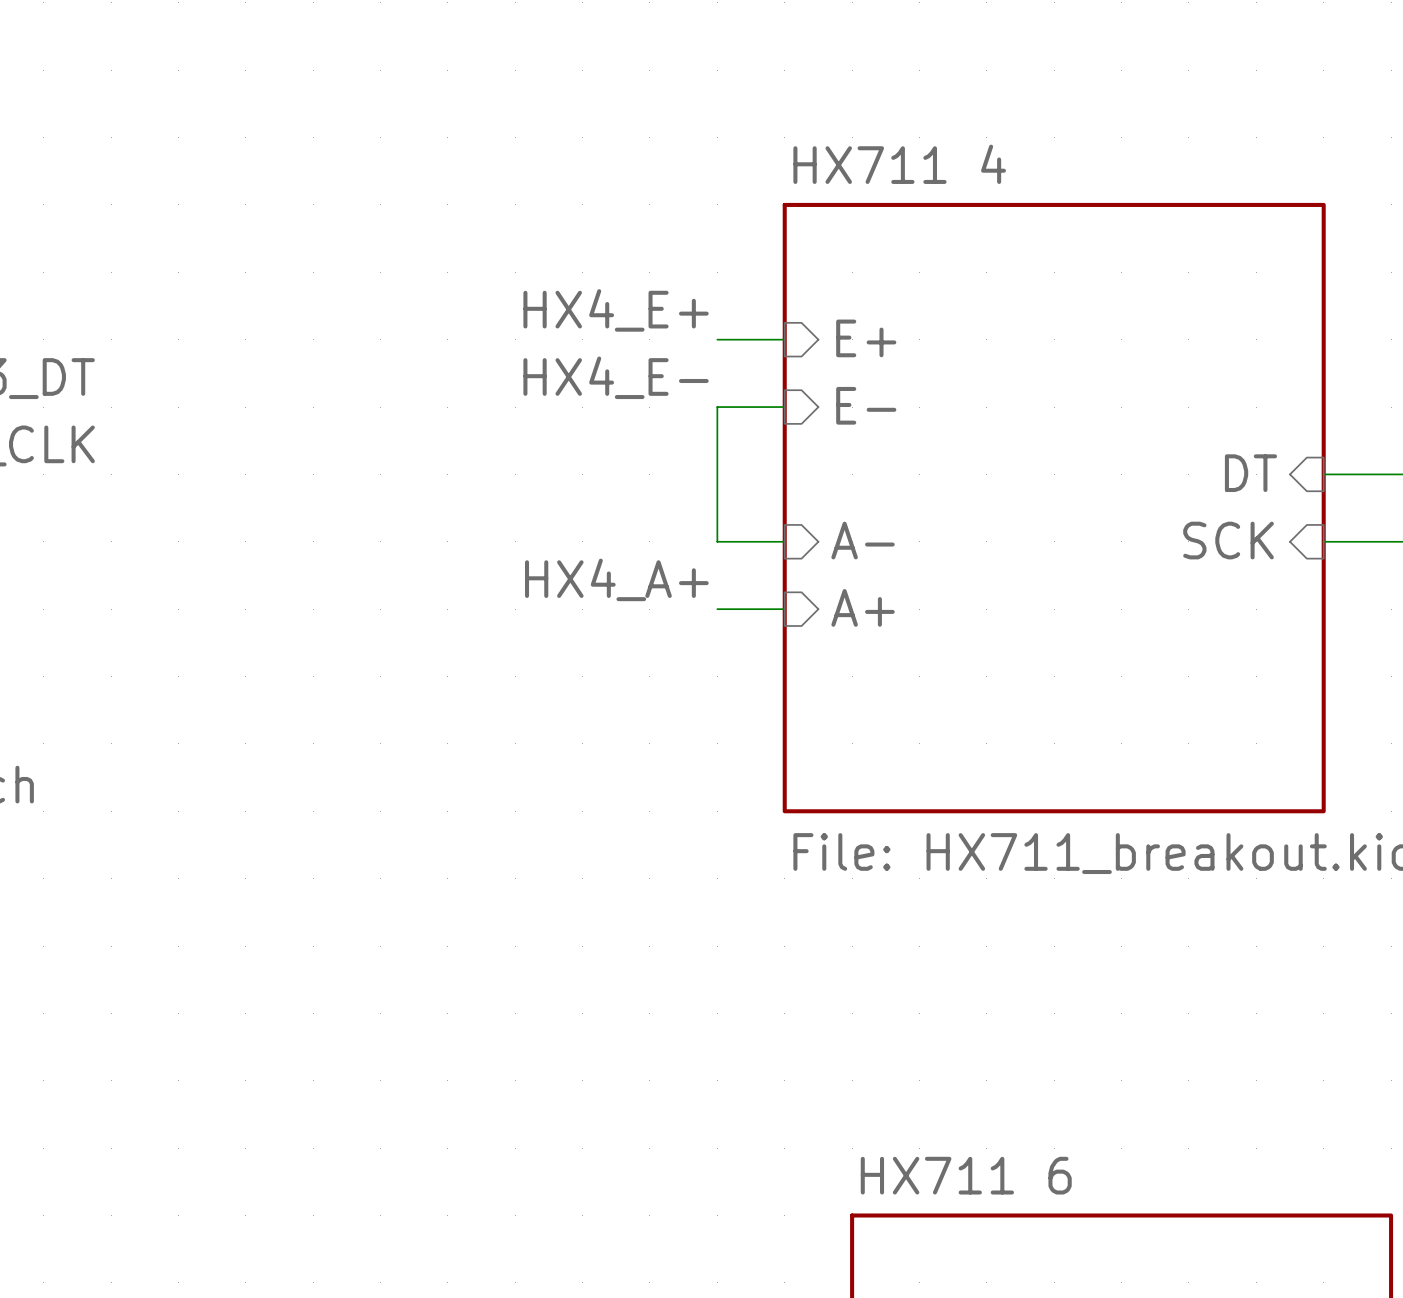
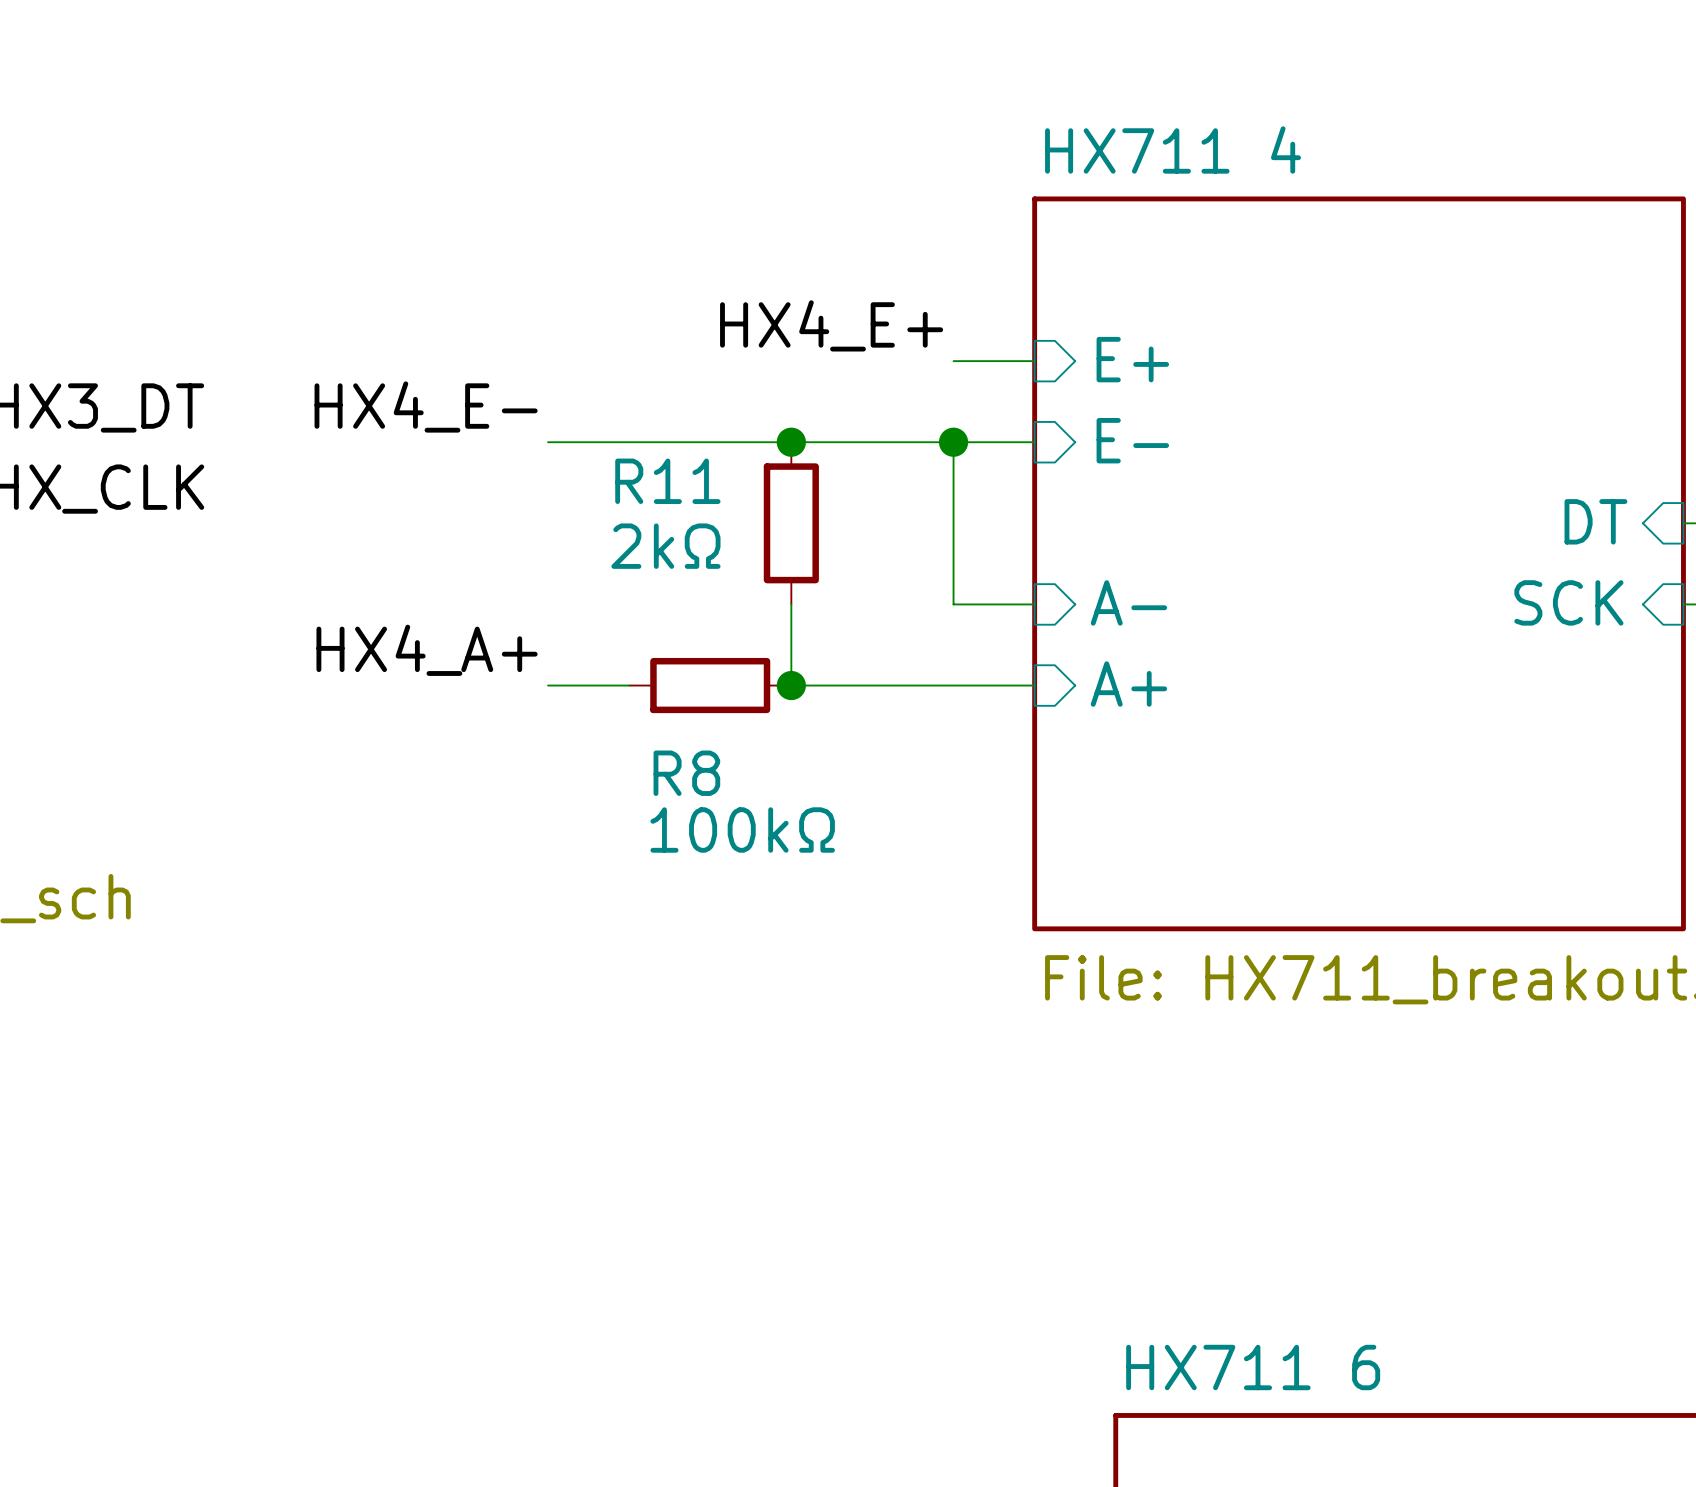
label position: HX4_E- (616, 377) -> HX4_E- (426, 407)
wire: none -> (548, 442) (953, 442)
junction: none -> (791, 442)
junction: none -> (953, 442)
R11: none -> 2kΩ (791, 523)
wire: none -> (791, 604) (791, 685) (953, 685)
label position: HX4_A+ (616, 579) -> HX4_A+ (427, 650)
wire: none -> (548, 685) (629, 685)
R8: none -> 100kΩ (710, 685)
junction: none -> (791, 685)

